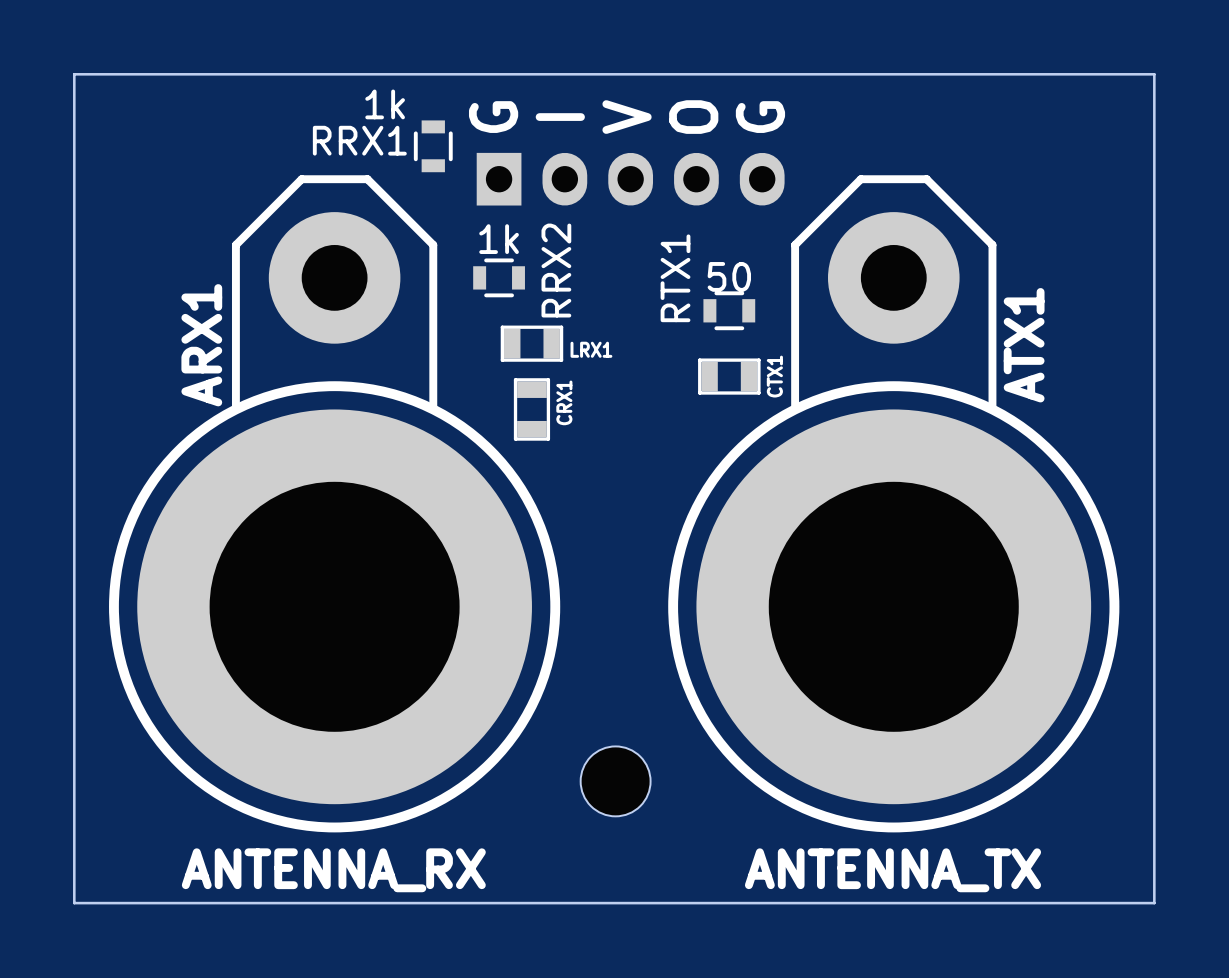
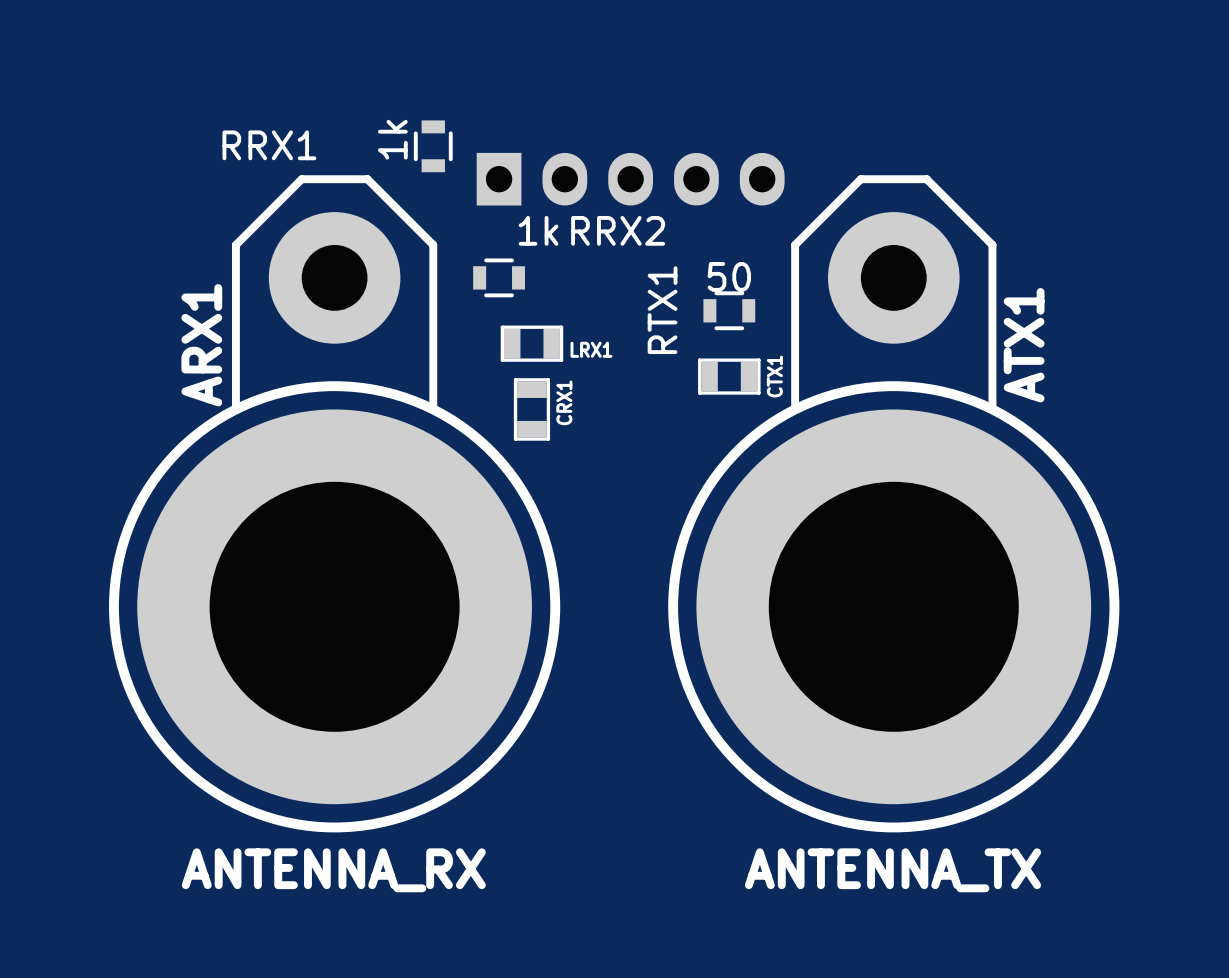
board edge: (74, 74) (74, 903) (1154, 903) (1154, 74) (74, 74) -> none
RRX1 value rotation: 0° (385, 104) -> 90° counterclockwise (392, 139)
text: G (493, 117) -> none
text: I (560, 117) -> none
text: V (627, 117) -> none
text: O (693, 117) -> none
text: G (760, 117) -> none
RRX1 name position: RRX1 (359, 140) -> RRX1 (269, 145)
RRX2 value position: 1k (499, 239) -> 1k (538, 230)
RRX2 name rotation: 0° (556, 270) -> 90° clockwise (618, 230)
RTX1 name position: RTX1 (675, 278) -> RTX1 (662, 310)
part: (615, 781) -> none

